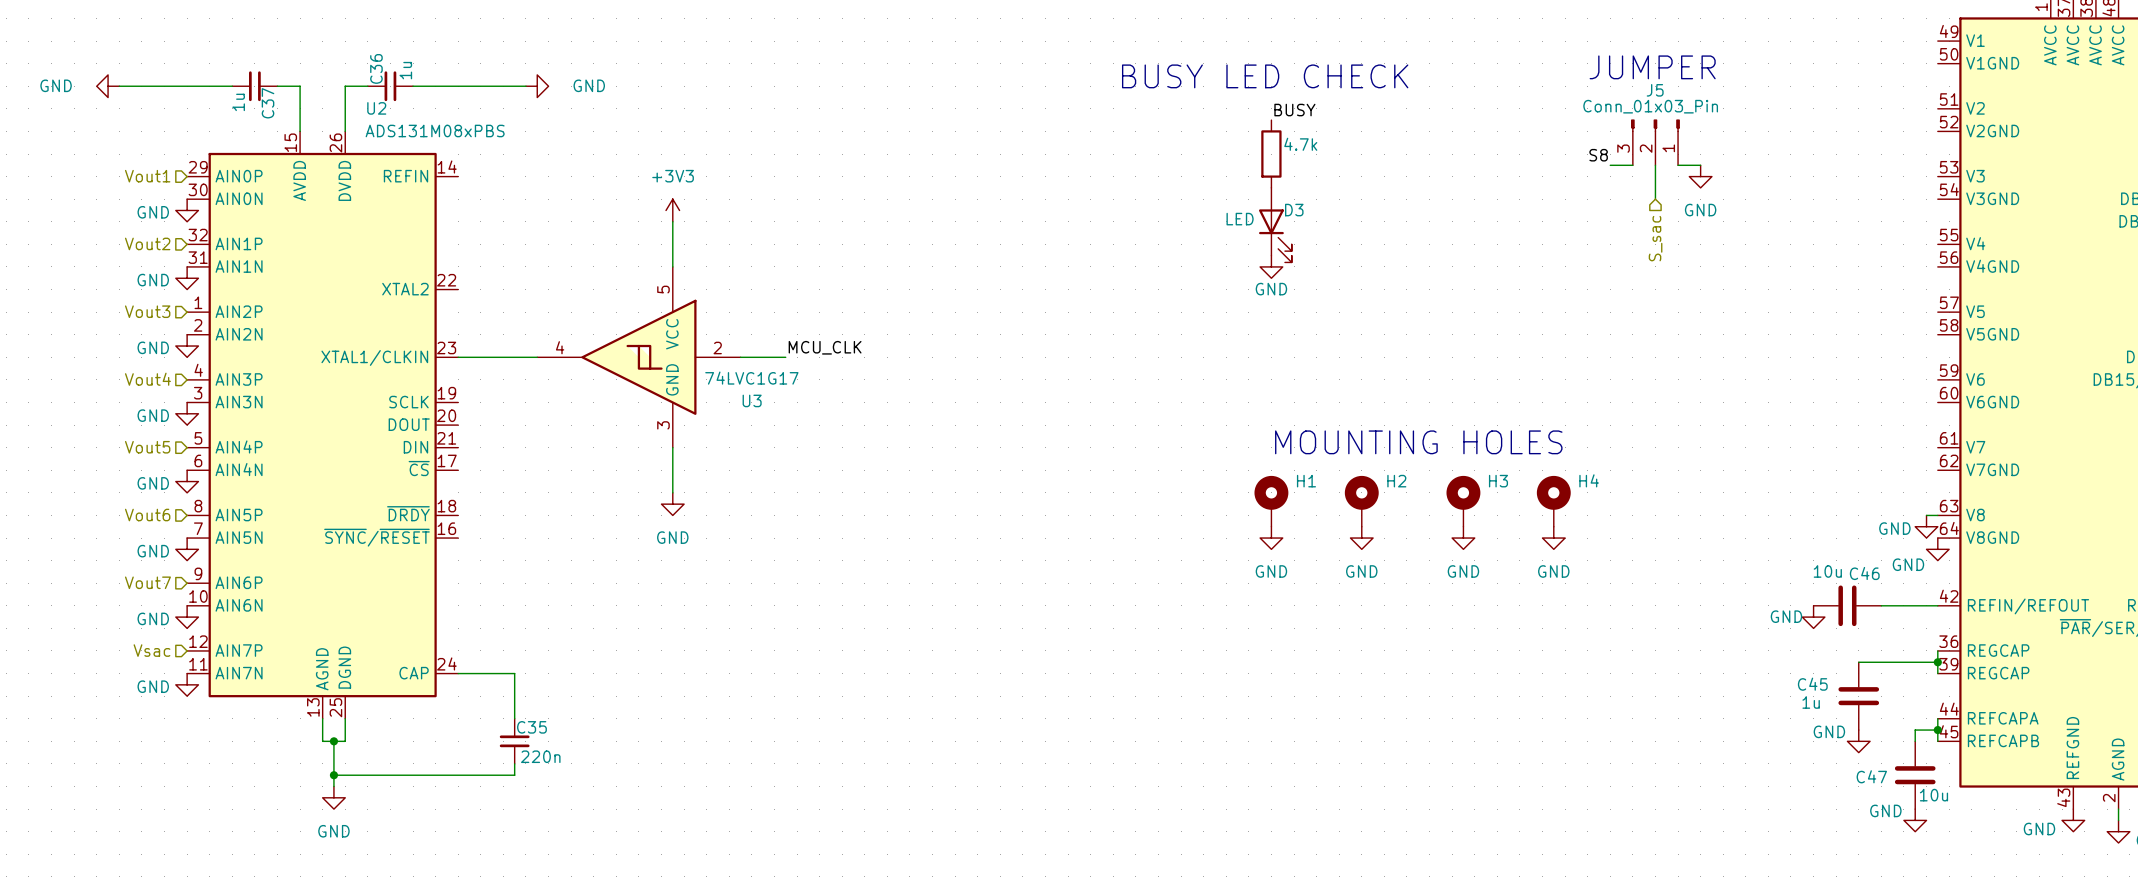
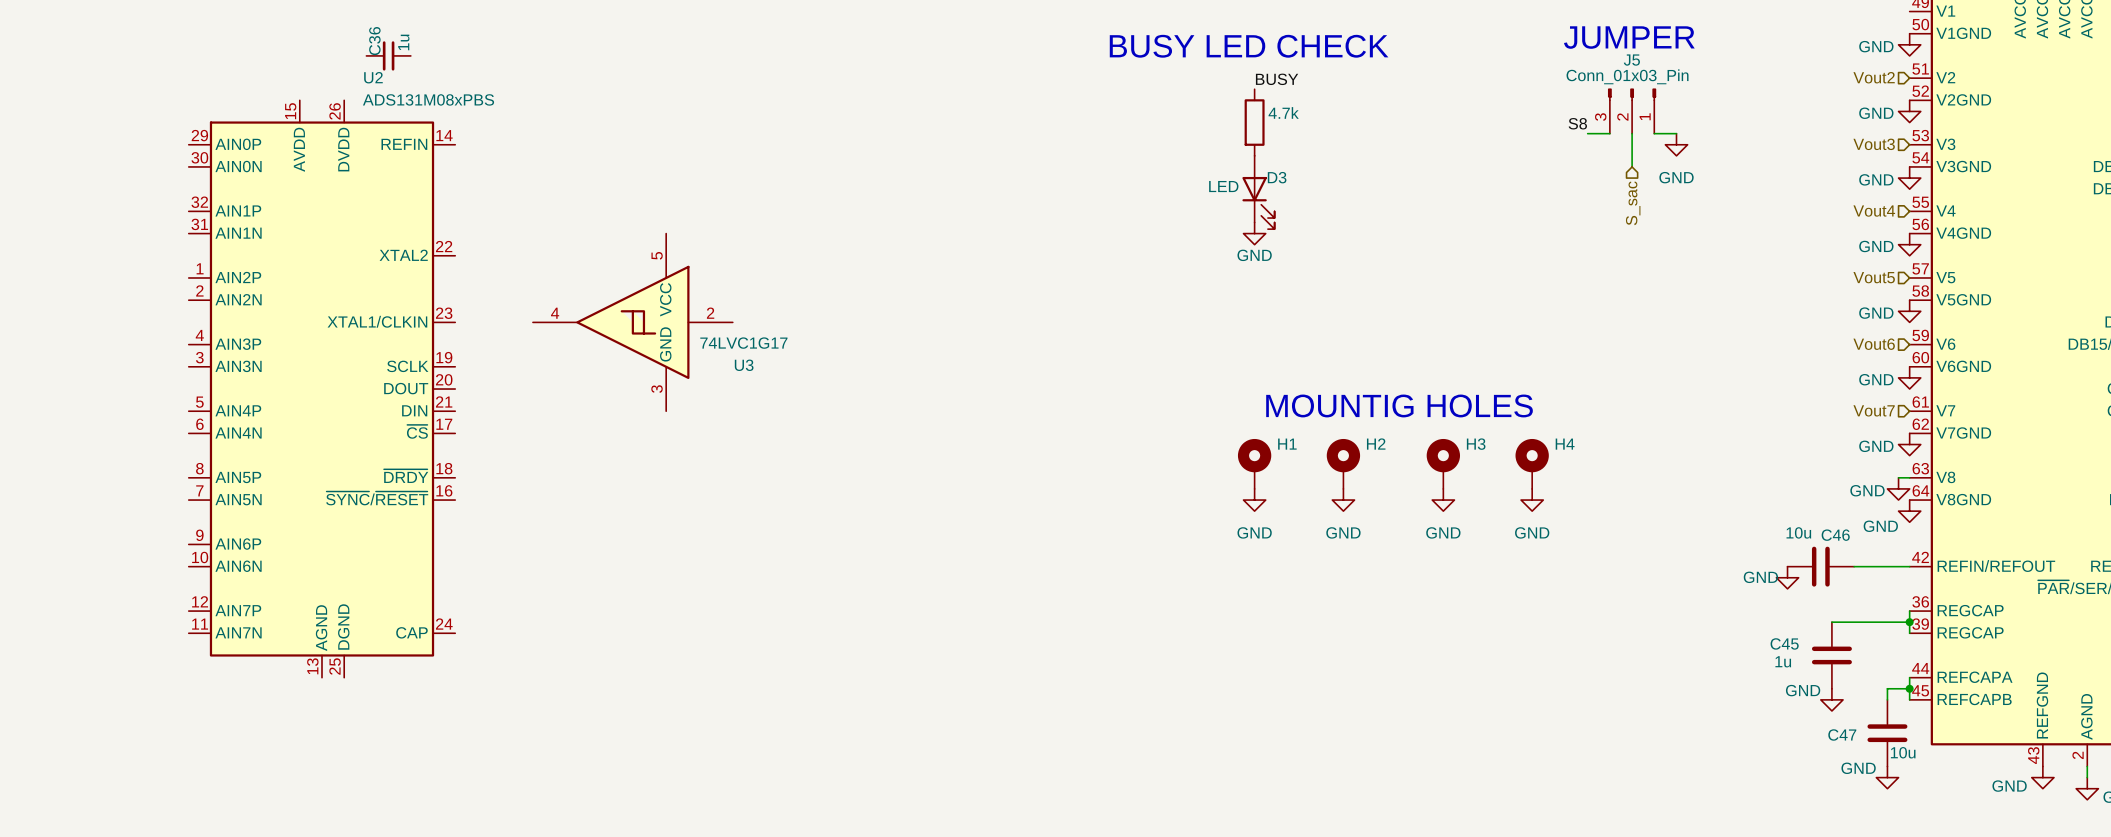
power symbol: none -> GND (1909, 44)
power symbol: GND (108, 86) -> none
wire: (119, 86) (232, 86) -> none
C37: 1u (254, 86) -> none
wire: (277, 86) (300, 86) (300, 131) -> none
wire: (367, 86) (345, 86) (345, 131) -> none
wire: (413, 86) (525, 86) -> none
power symbol: GND (537, 86) -> none
hierarchical label: none -> Vout2 (1874, 77)
power symbol: none -> GND (1909, 111)
hierarchical label: Vout1 (147, 176) -> none
hierarchical label: none -> Vout3 (1874, 144)
power symbol: GND (187, 210) -> none
power symbol: +3V3 (672, 210) -> none
power symbol: none -> GND (1909, 178)
wire: (672, 221) (672, 266) -> none
hierarchical label: Vout2 (147, 243) -> none
hierarchical label: none -> Vout4 (1874, 211)
power symbol: GND (187, 278) -> none
power symbol: none -> GND (1909, 244)
hierarchical label: Vout3 (147, 311) -> none
hierarchical label: none -> Vout5 (1874, 277)
power symbol: GND (187, 346) -> none
power symbol: none -> GND (1909, 311)
label: MCU_CLK (825, 347) -> none
wire: (458, 357) (537, 357) -> none
wire: (740, 357) (785, 357) -> none
hierarchical label: Vout4 (147, 379) -> none
hierarchical label: none -> Vout6 (1874, 344)
power symbol: GND (187, 413) -> none
power symbol: none -> GND (1909, 377)
text: MOUNTING HOLES (1418, 442) -> MOUNTIG HOLES (1399, 405)
hierarchical label: Vout5 (147, 447) -> none
wire: (672, 447) (672, 492) -> none
hierarchical label: none -> Vout7 (1874, 410)
power symbol: GND (187, 481) -> none
power symbol: none -> GND (1909, 444)
power symbol: GND (672, 504) -> none
hierarchical label: Vout6 (147, 515) -> none
power symbol: GND (187, 549) -> none
hierarchical label: Vout7 (147, 582) -> none
power symbol: GND (187, 617) -> none
hierarchical label: Vsac (151, 650) -> none
wire: (458, 673) (514, 673) (514, 718) -> none
power symbol: GND (187, 684) -> none
wire: (322, 718) (322, 741) (345, 741) (345, 718) -> none
wire: (333, 741) (333, 786) -> none
junction: (333, 741) -> none
C35: 220n (514, 741) -> none
wire: (514, 763) (514, 775) (333, 775) -> none
junction: (333, 775) -> none
power symbol: GND (333, 797) -> none

